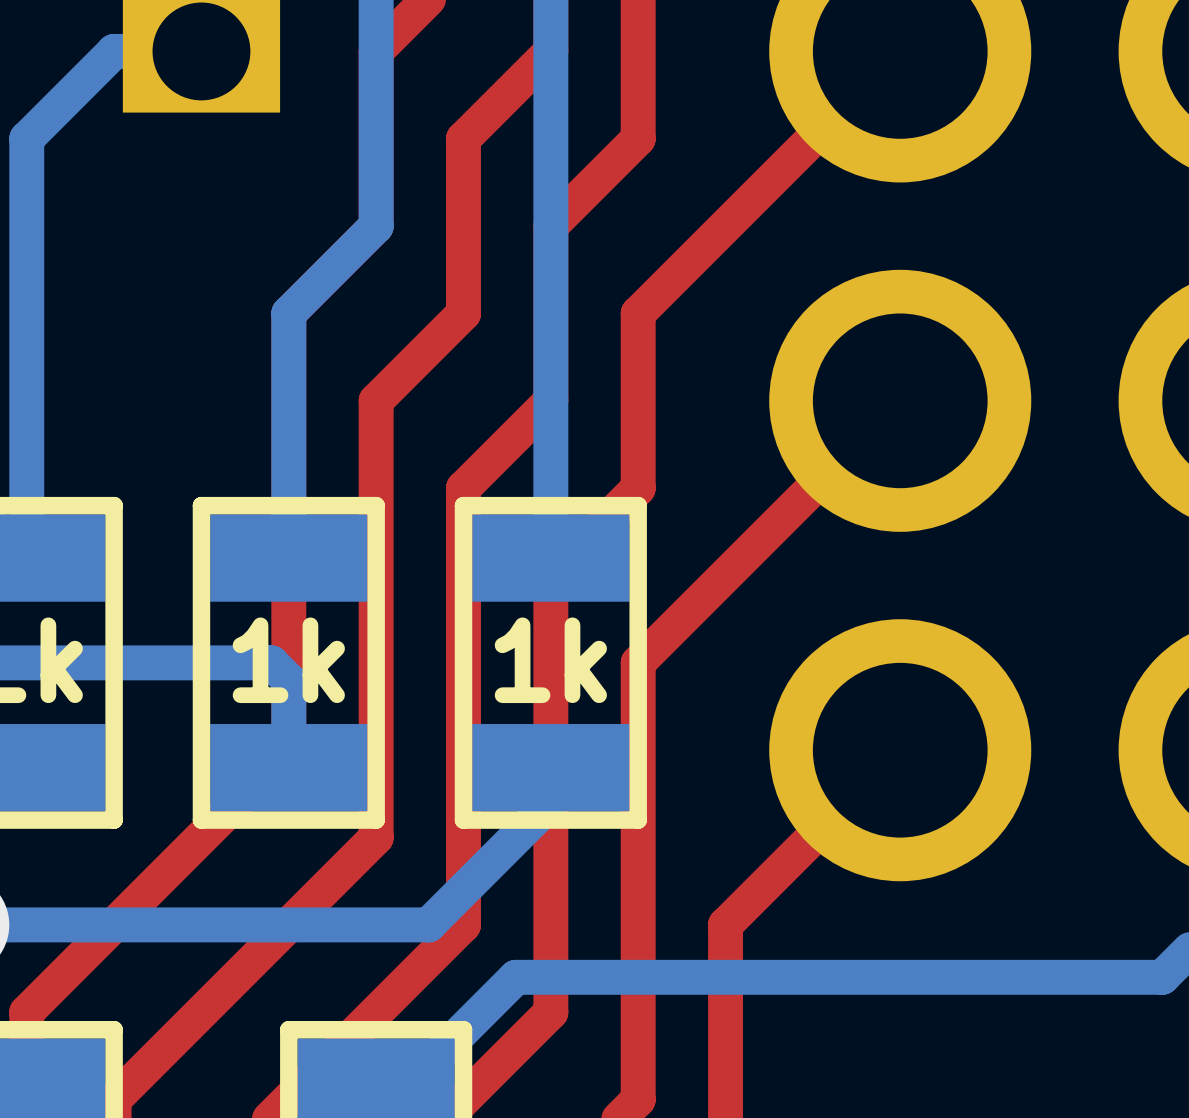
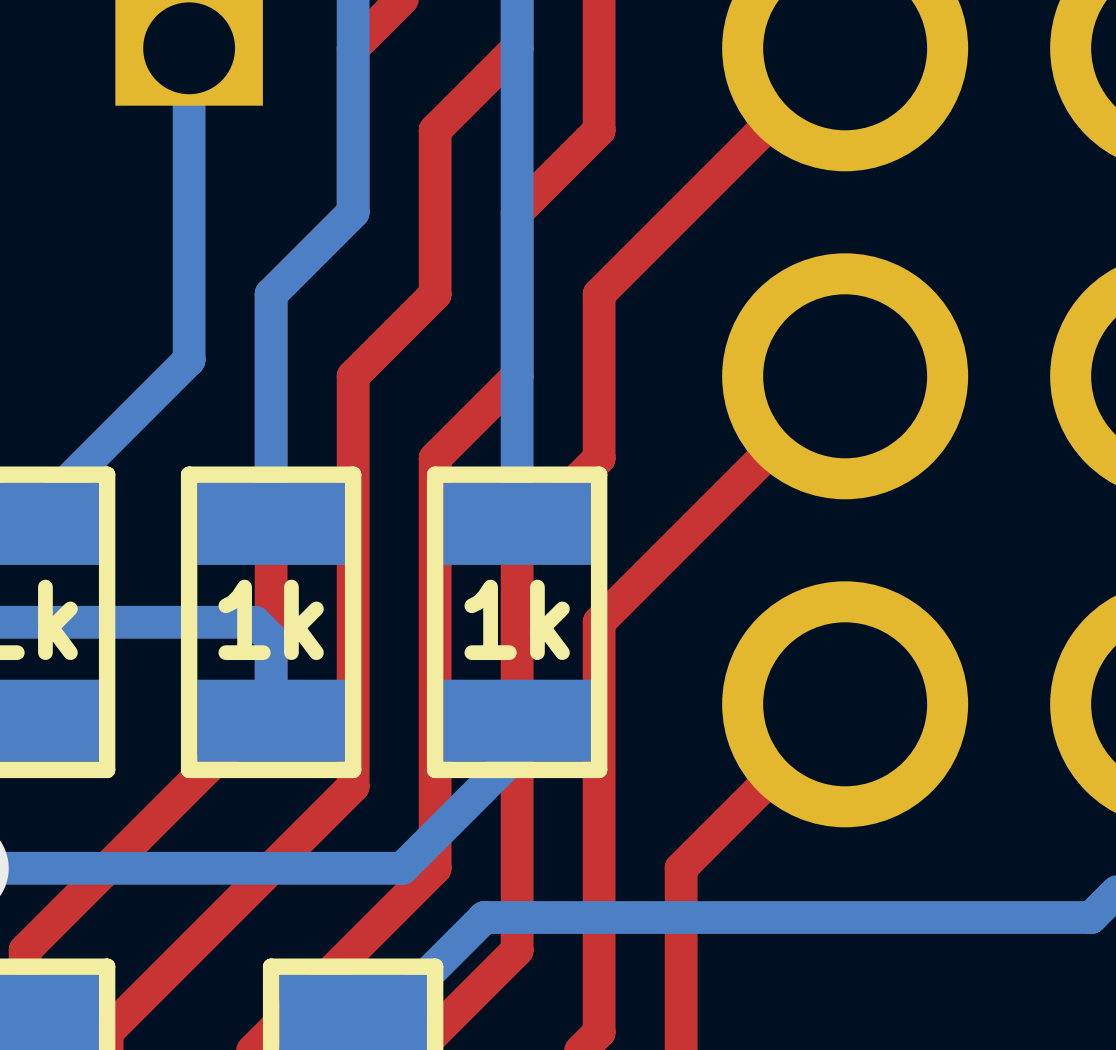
bottom track: (201, 51) (114, 51) (26, 138) (26, 558) -> (189, 48) (189, 359) (25, 523)

